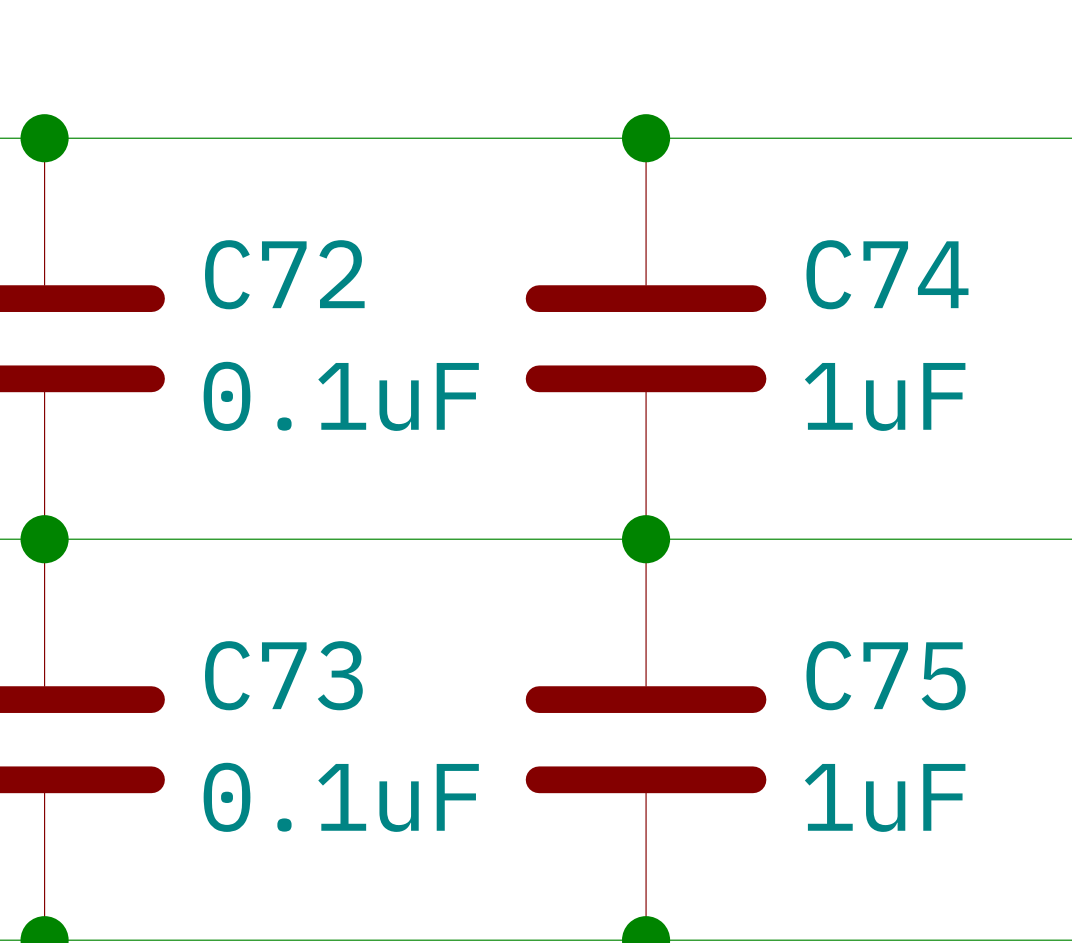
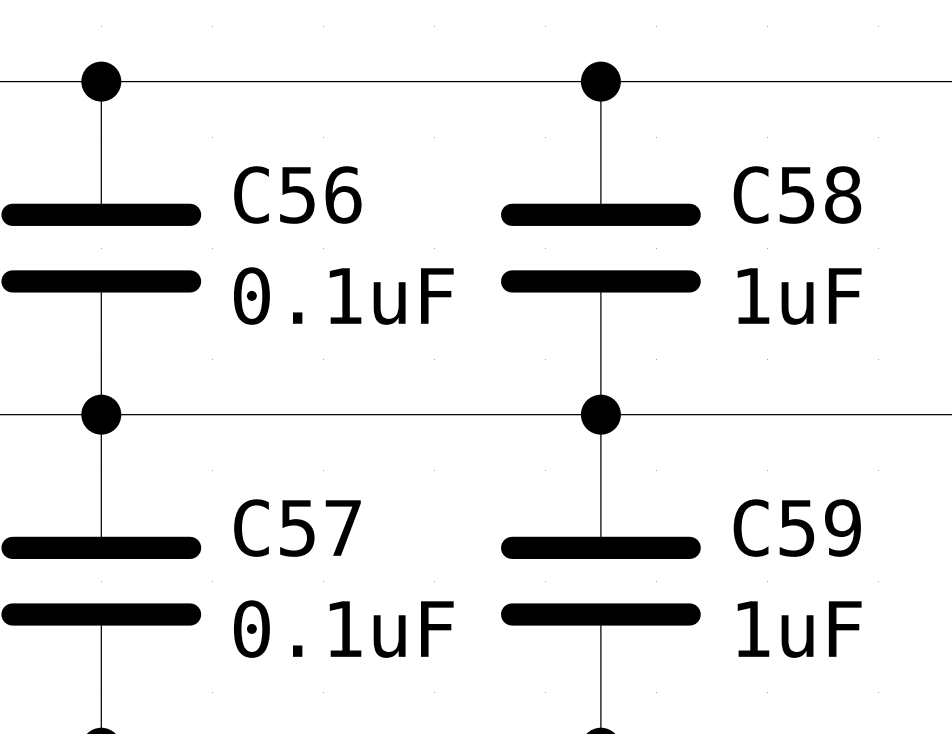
C72 name: C72 (284, 274) -> C56 (297, 195)
C74 name: C74 (887, 274) -> C58 (797, 195)
C73 name: C73 (283, 675) -> C57 (297, 528)
C75 name: C75 (886, 675) -> C59 (797, 528)

